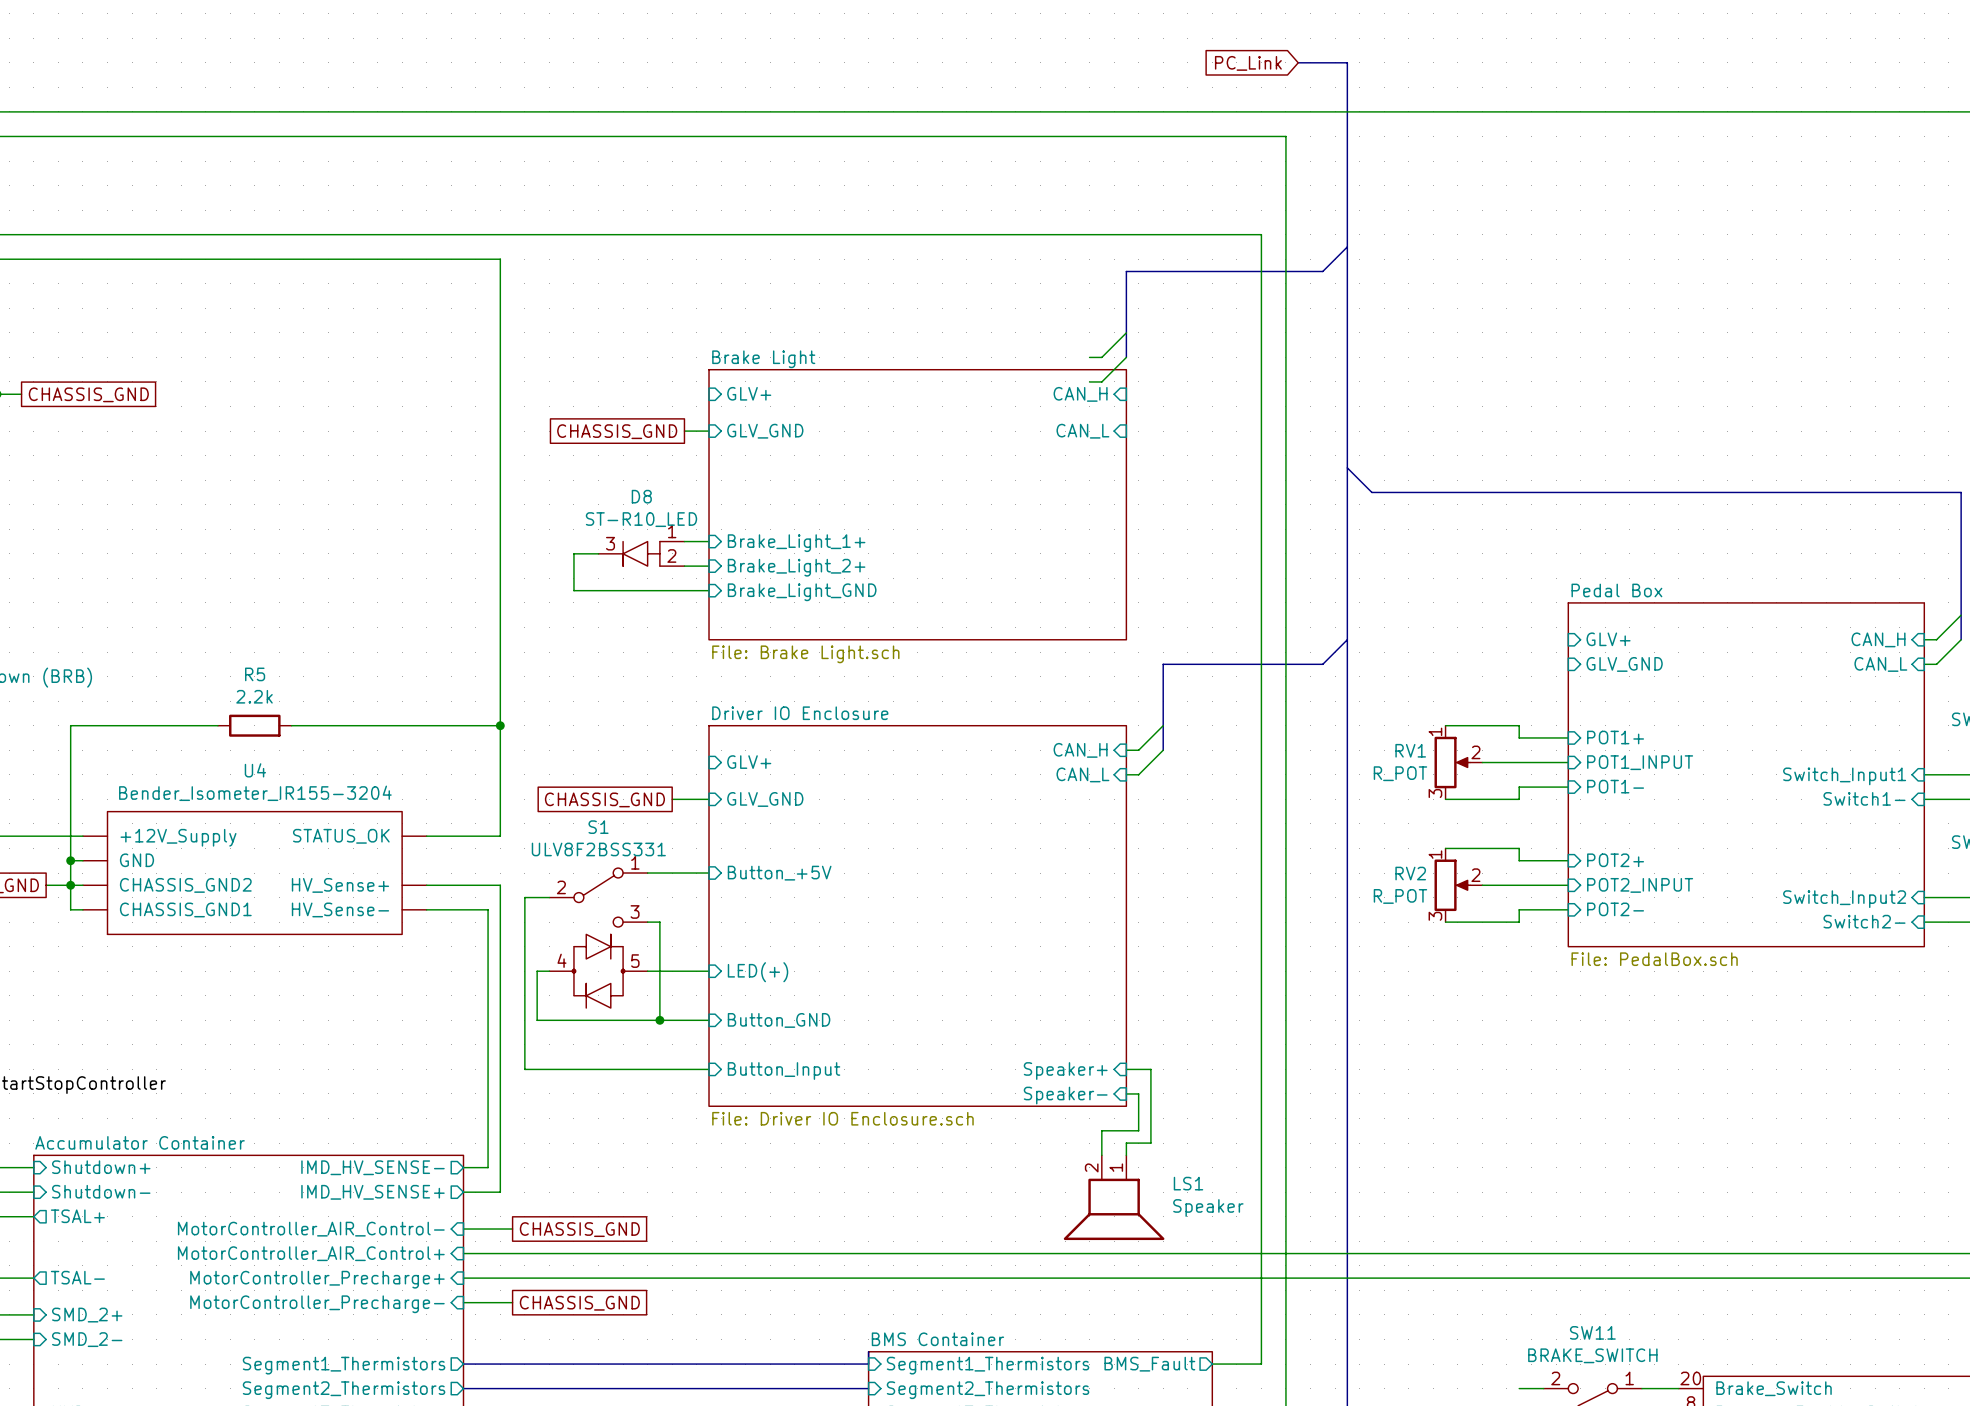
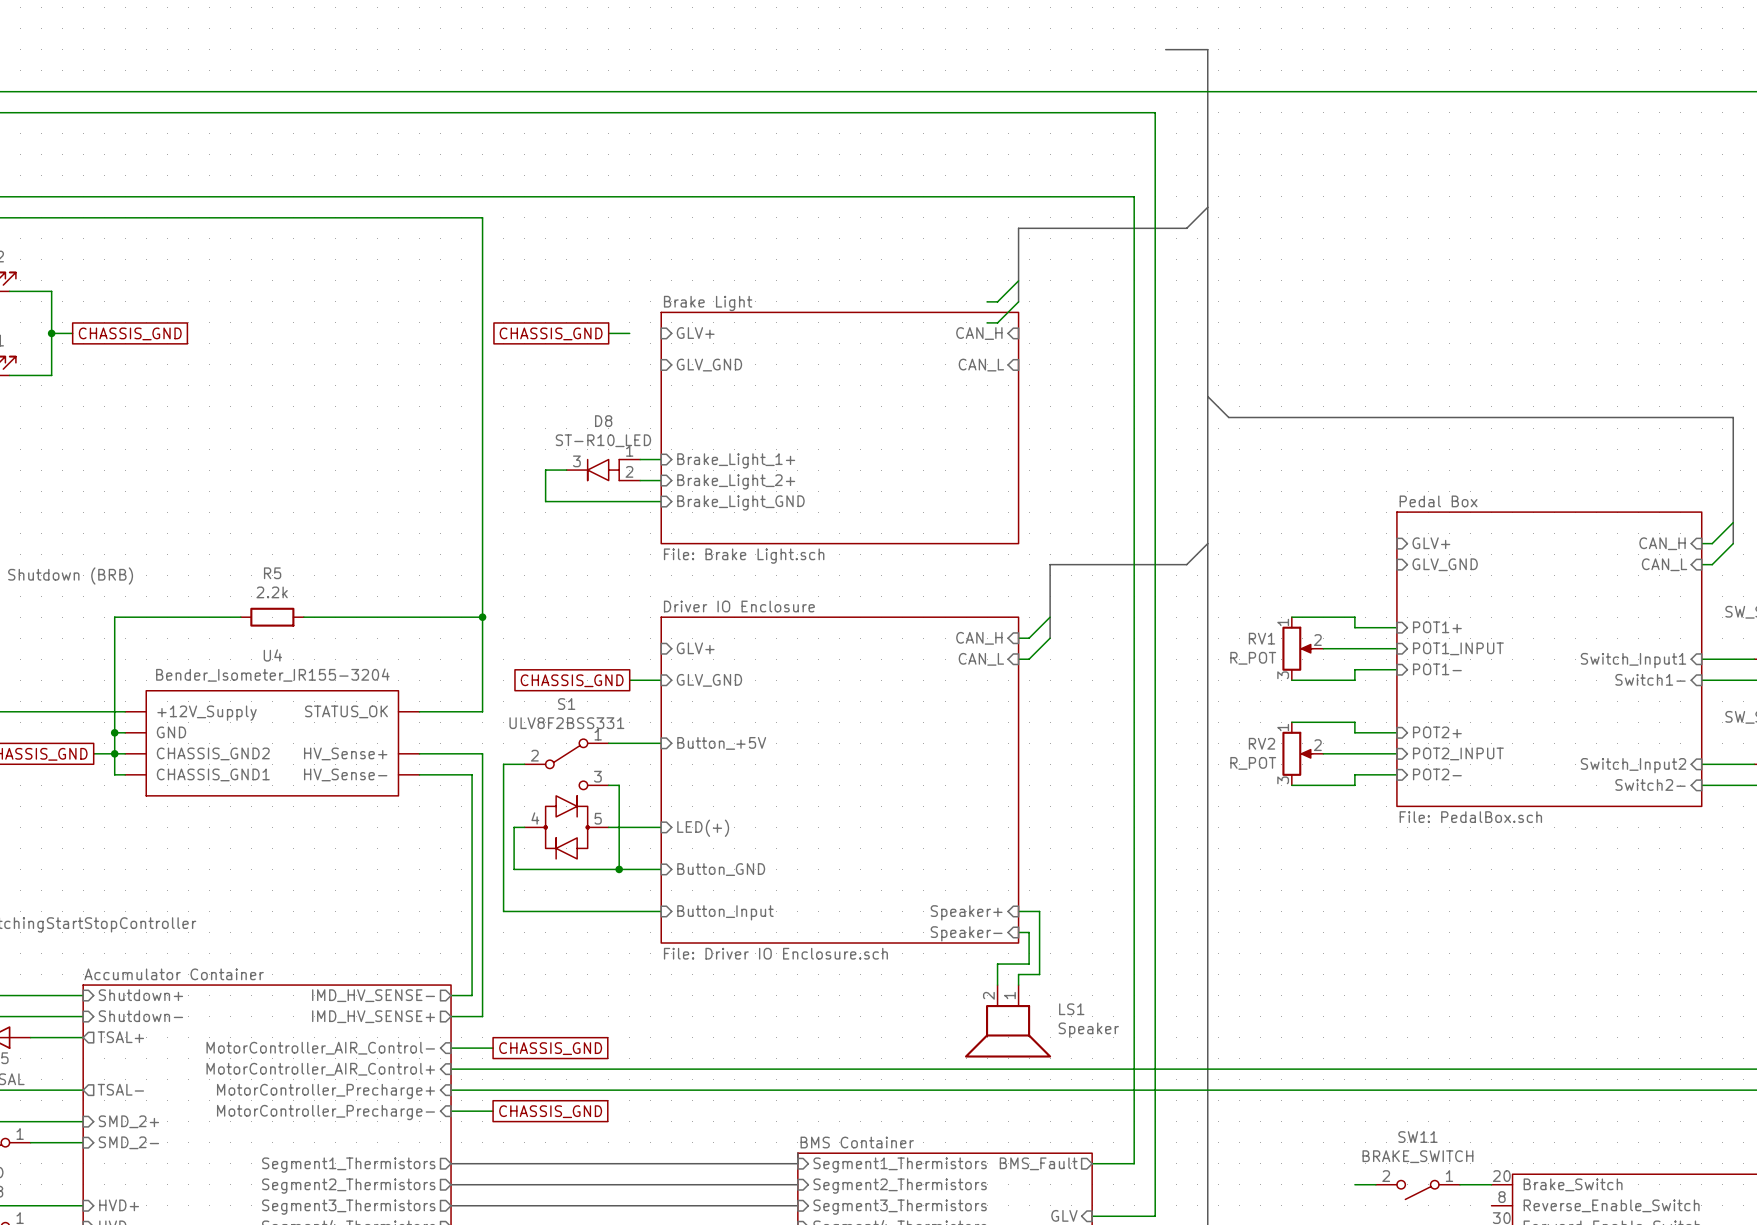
global label: PC_Link (1248, 63) -> none
global label position: CHASSIS_GND (617, 431) -> CHASSIS_GND (551, 333)
wire: (684, 431) (709, 431) -> (608, 333) (629, 333)

